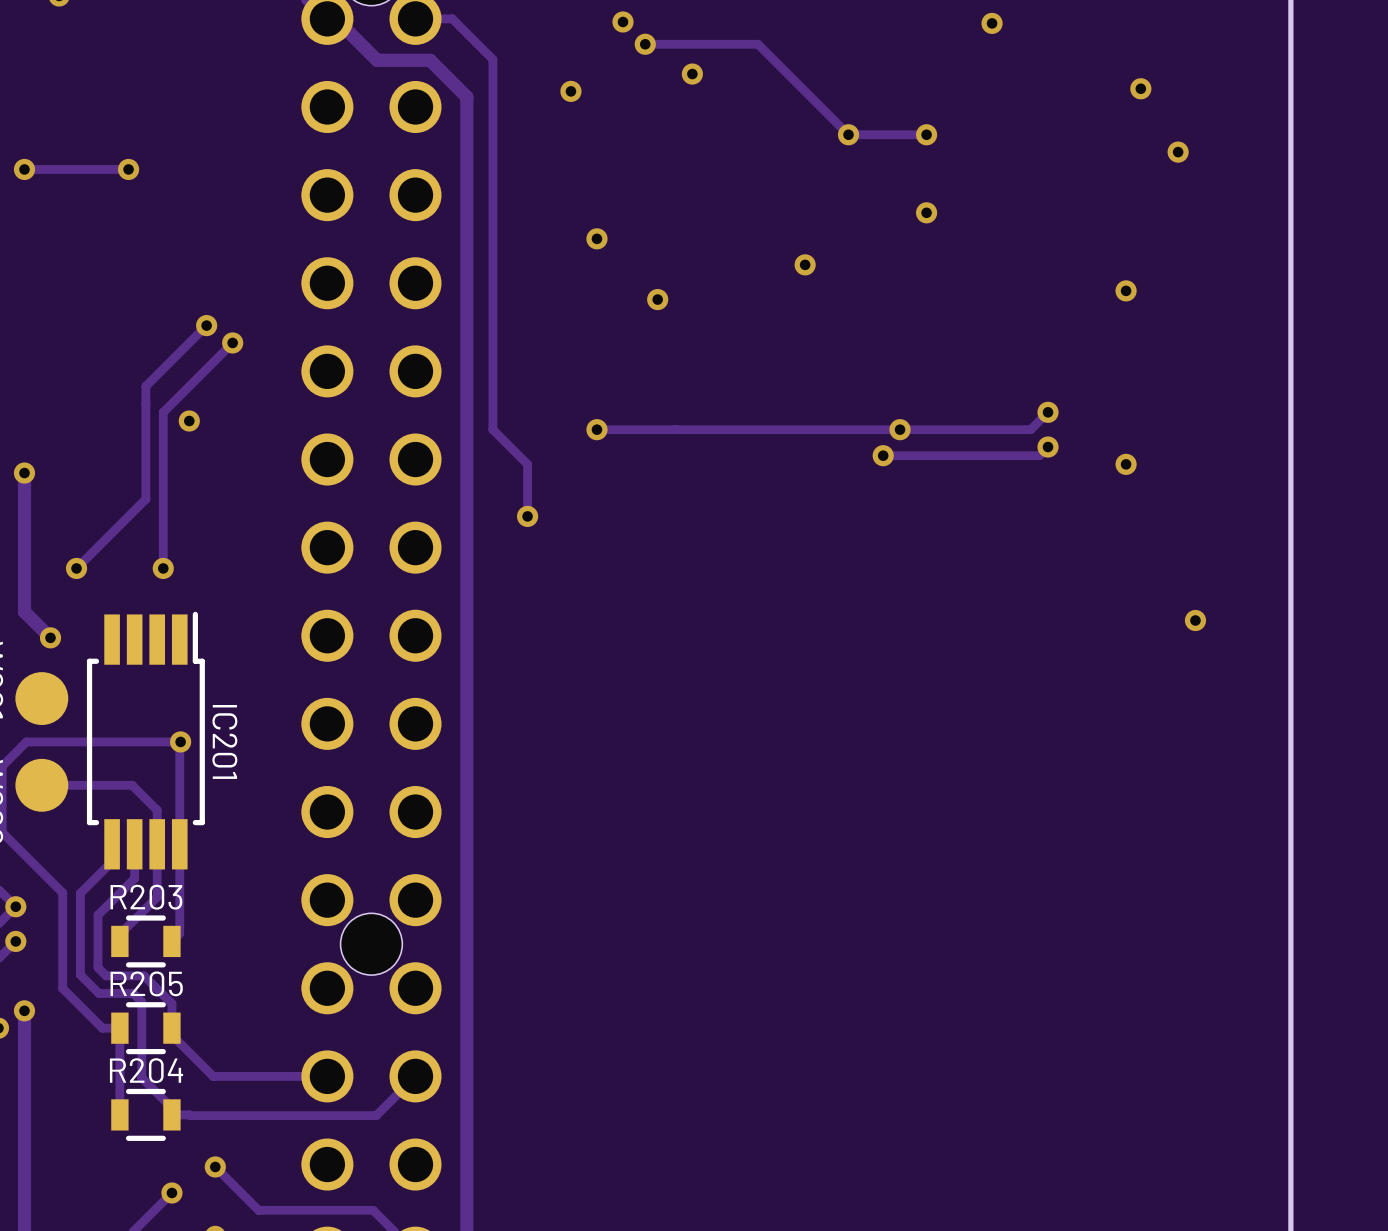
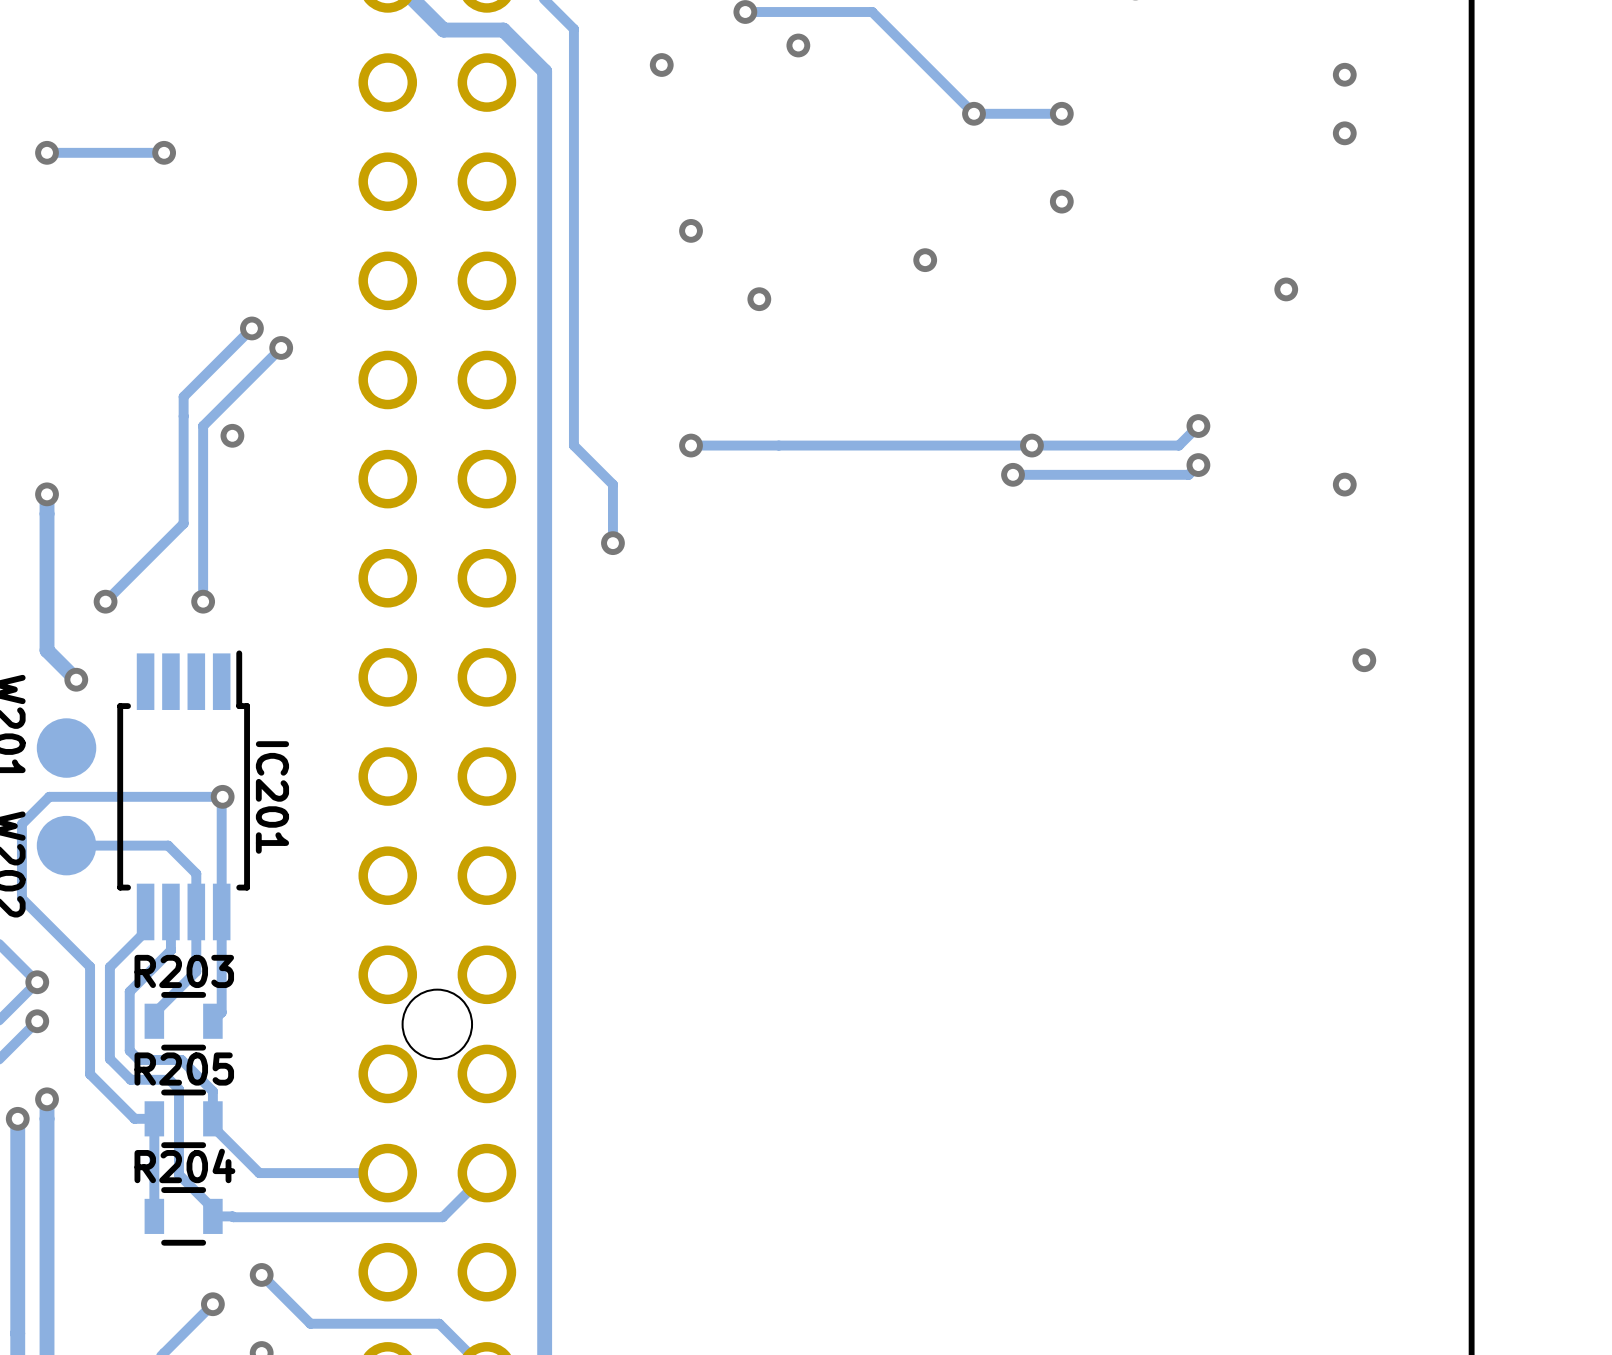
via position: (1140, 88) -> (1344, 74)
via position: (1126, 464) -> (1344, 484)

